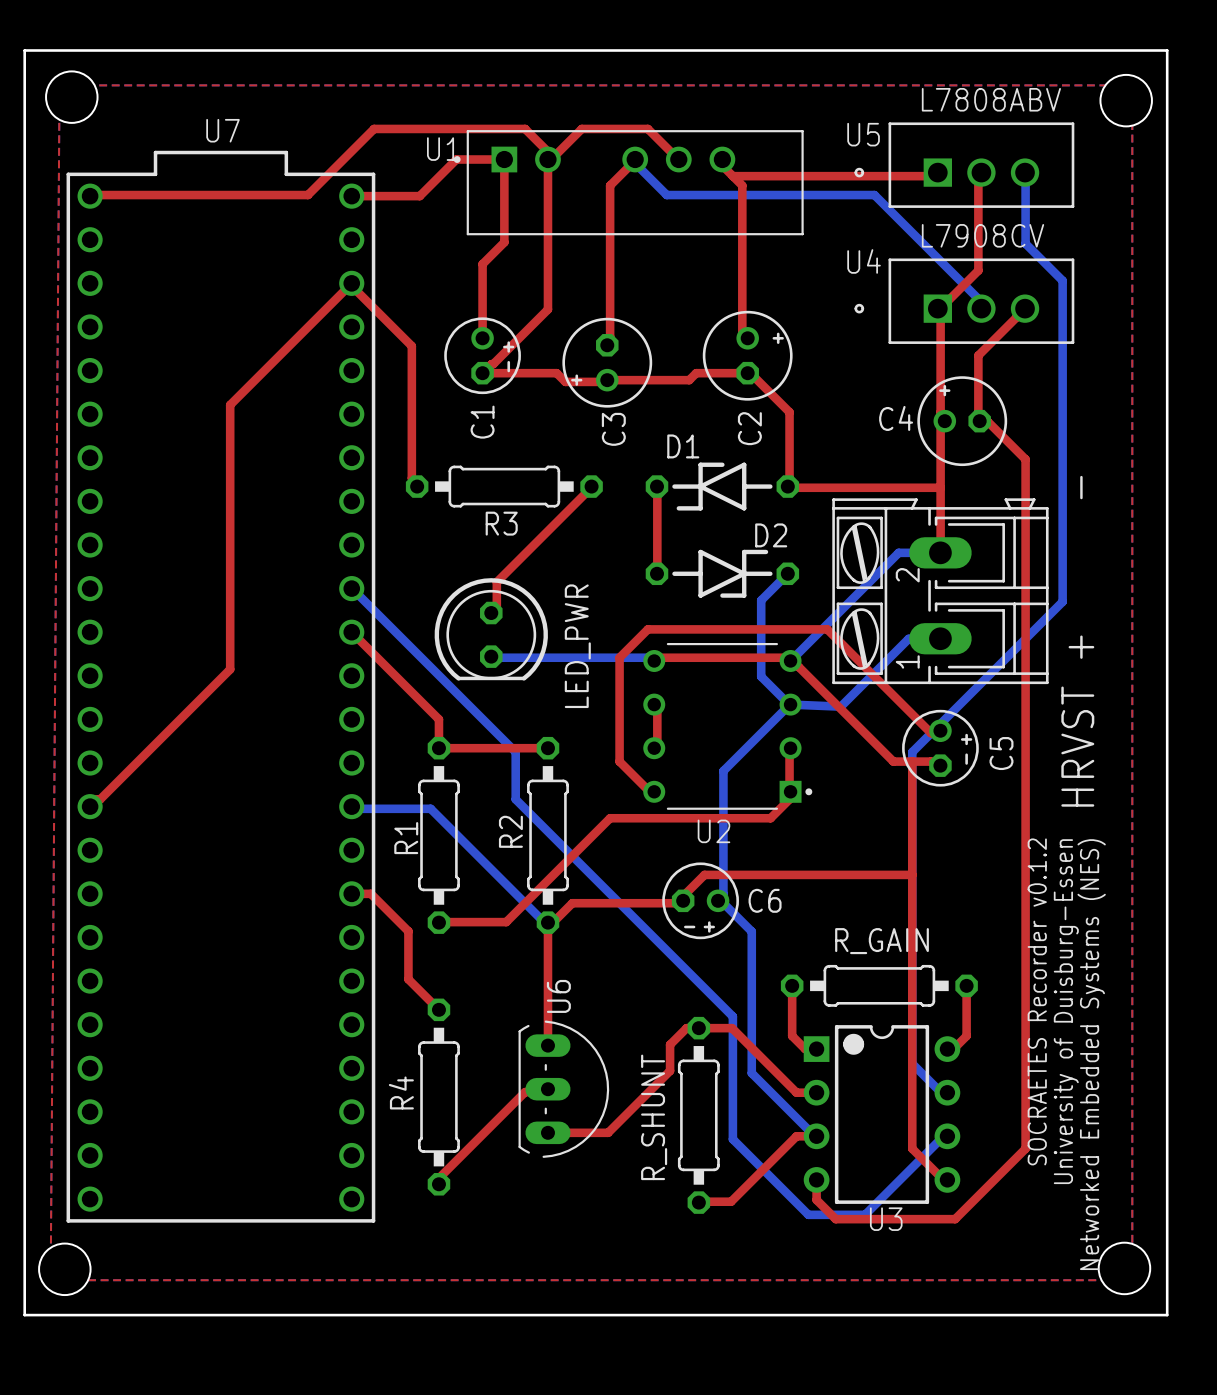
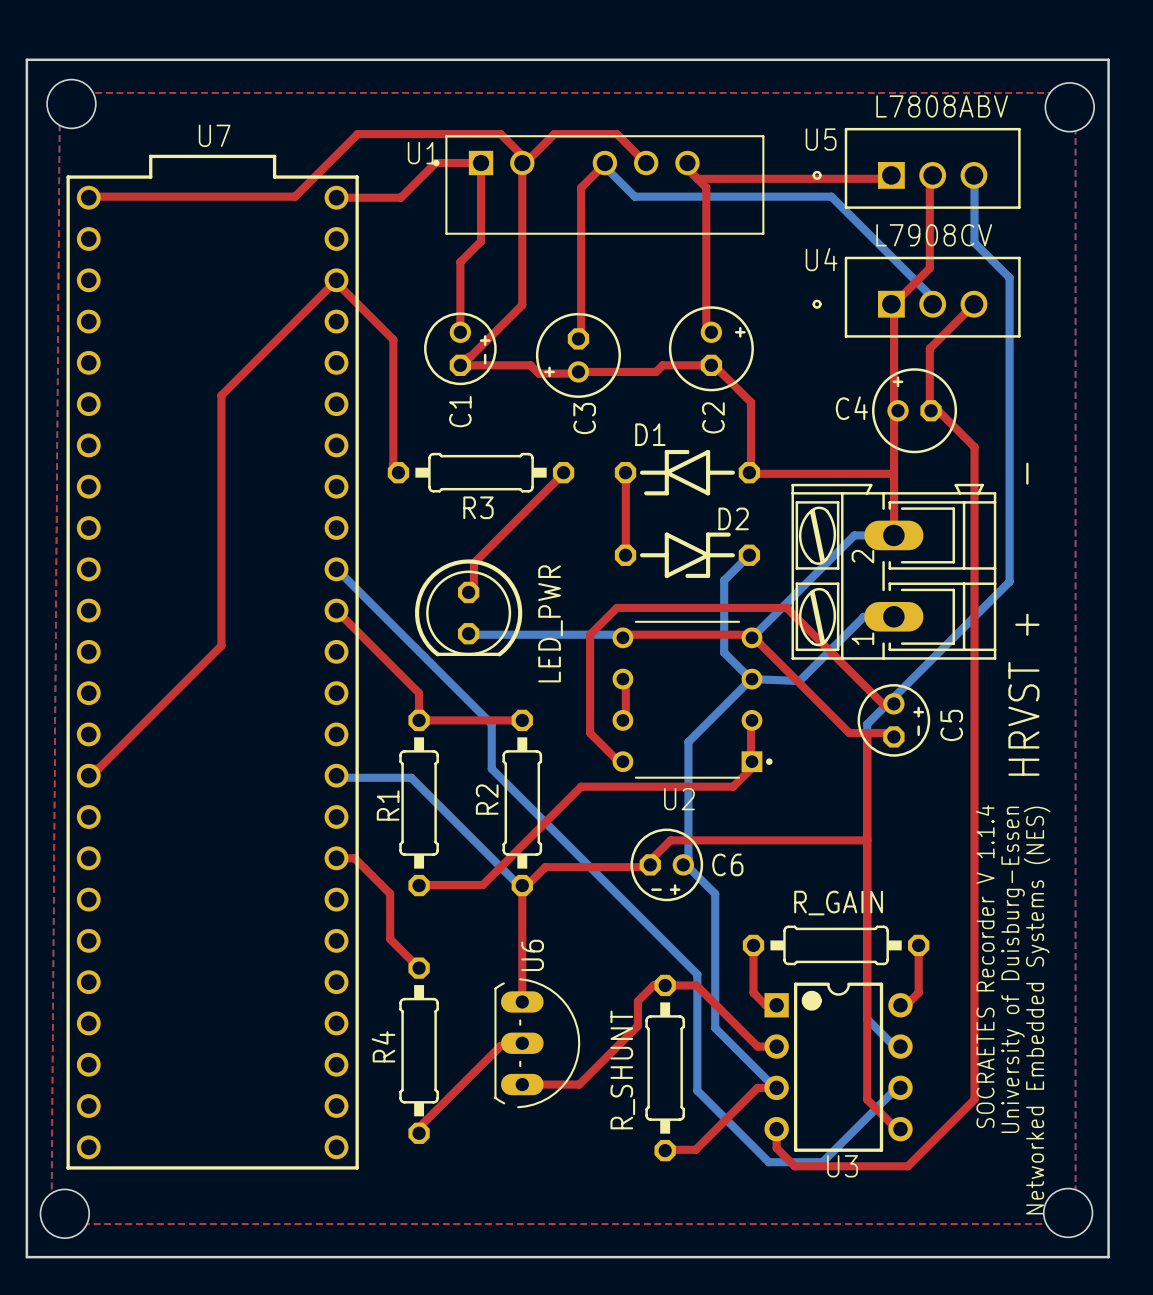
text: SOCRAETES Recorder v0.1.2 (1037, 1001) -> SOCRAETES Recorder V 1.1.4 (985, 966)

